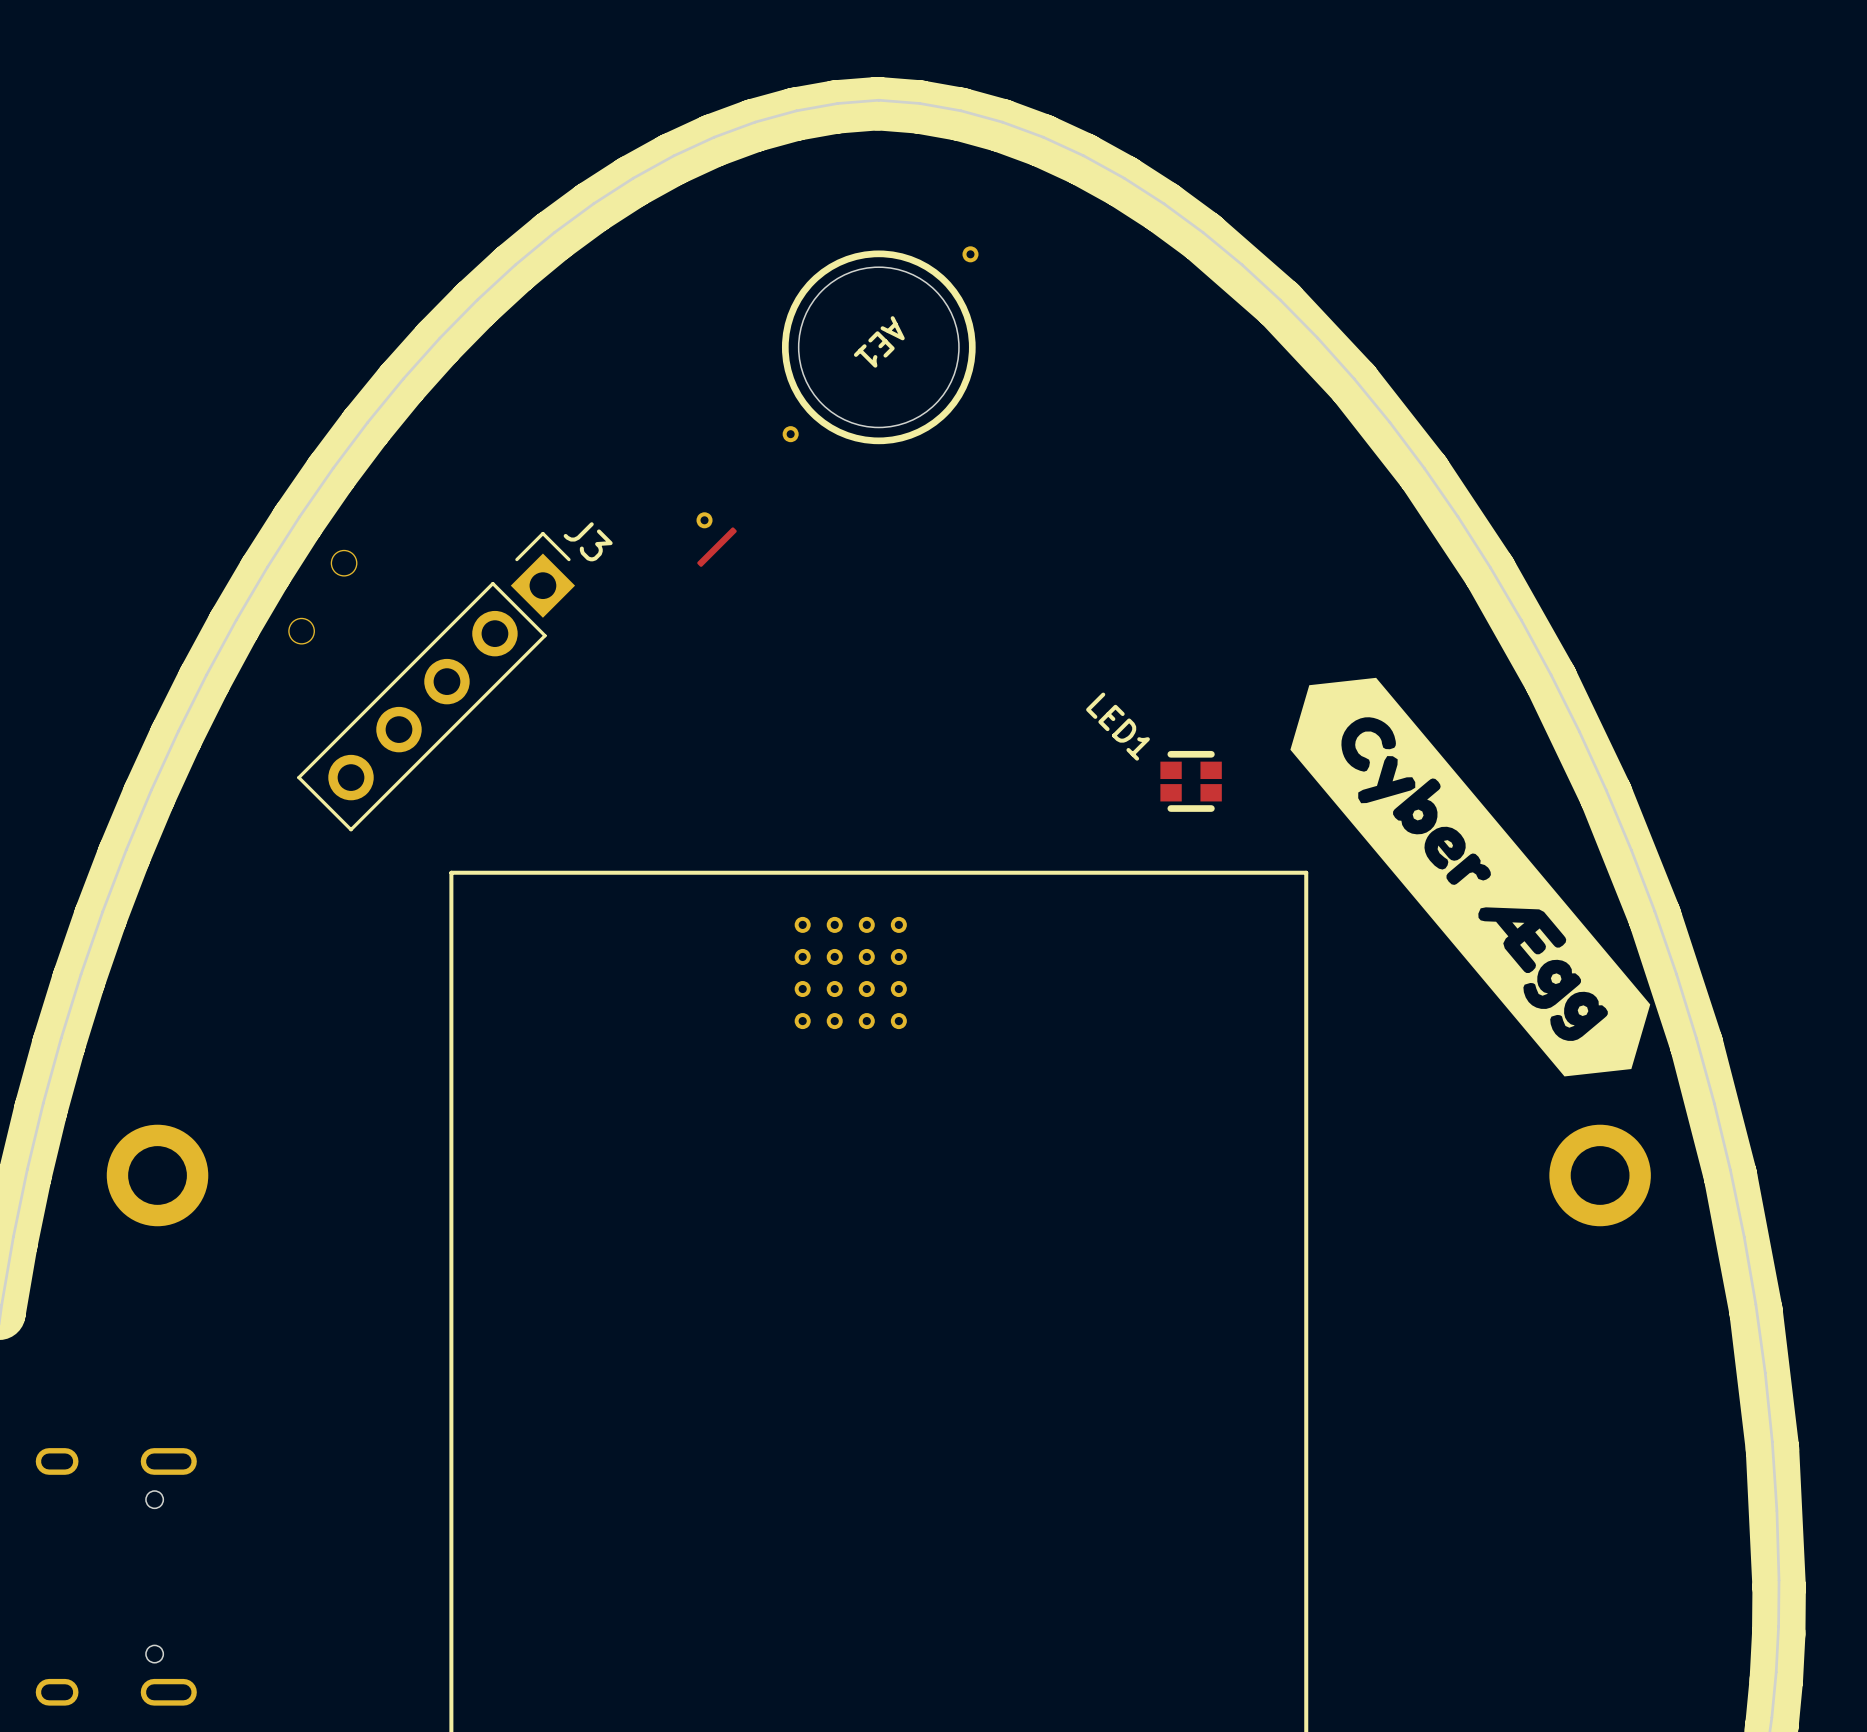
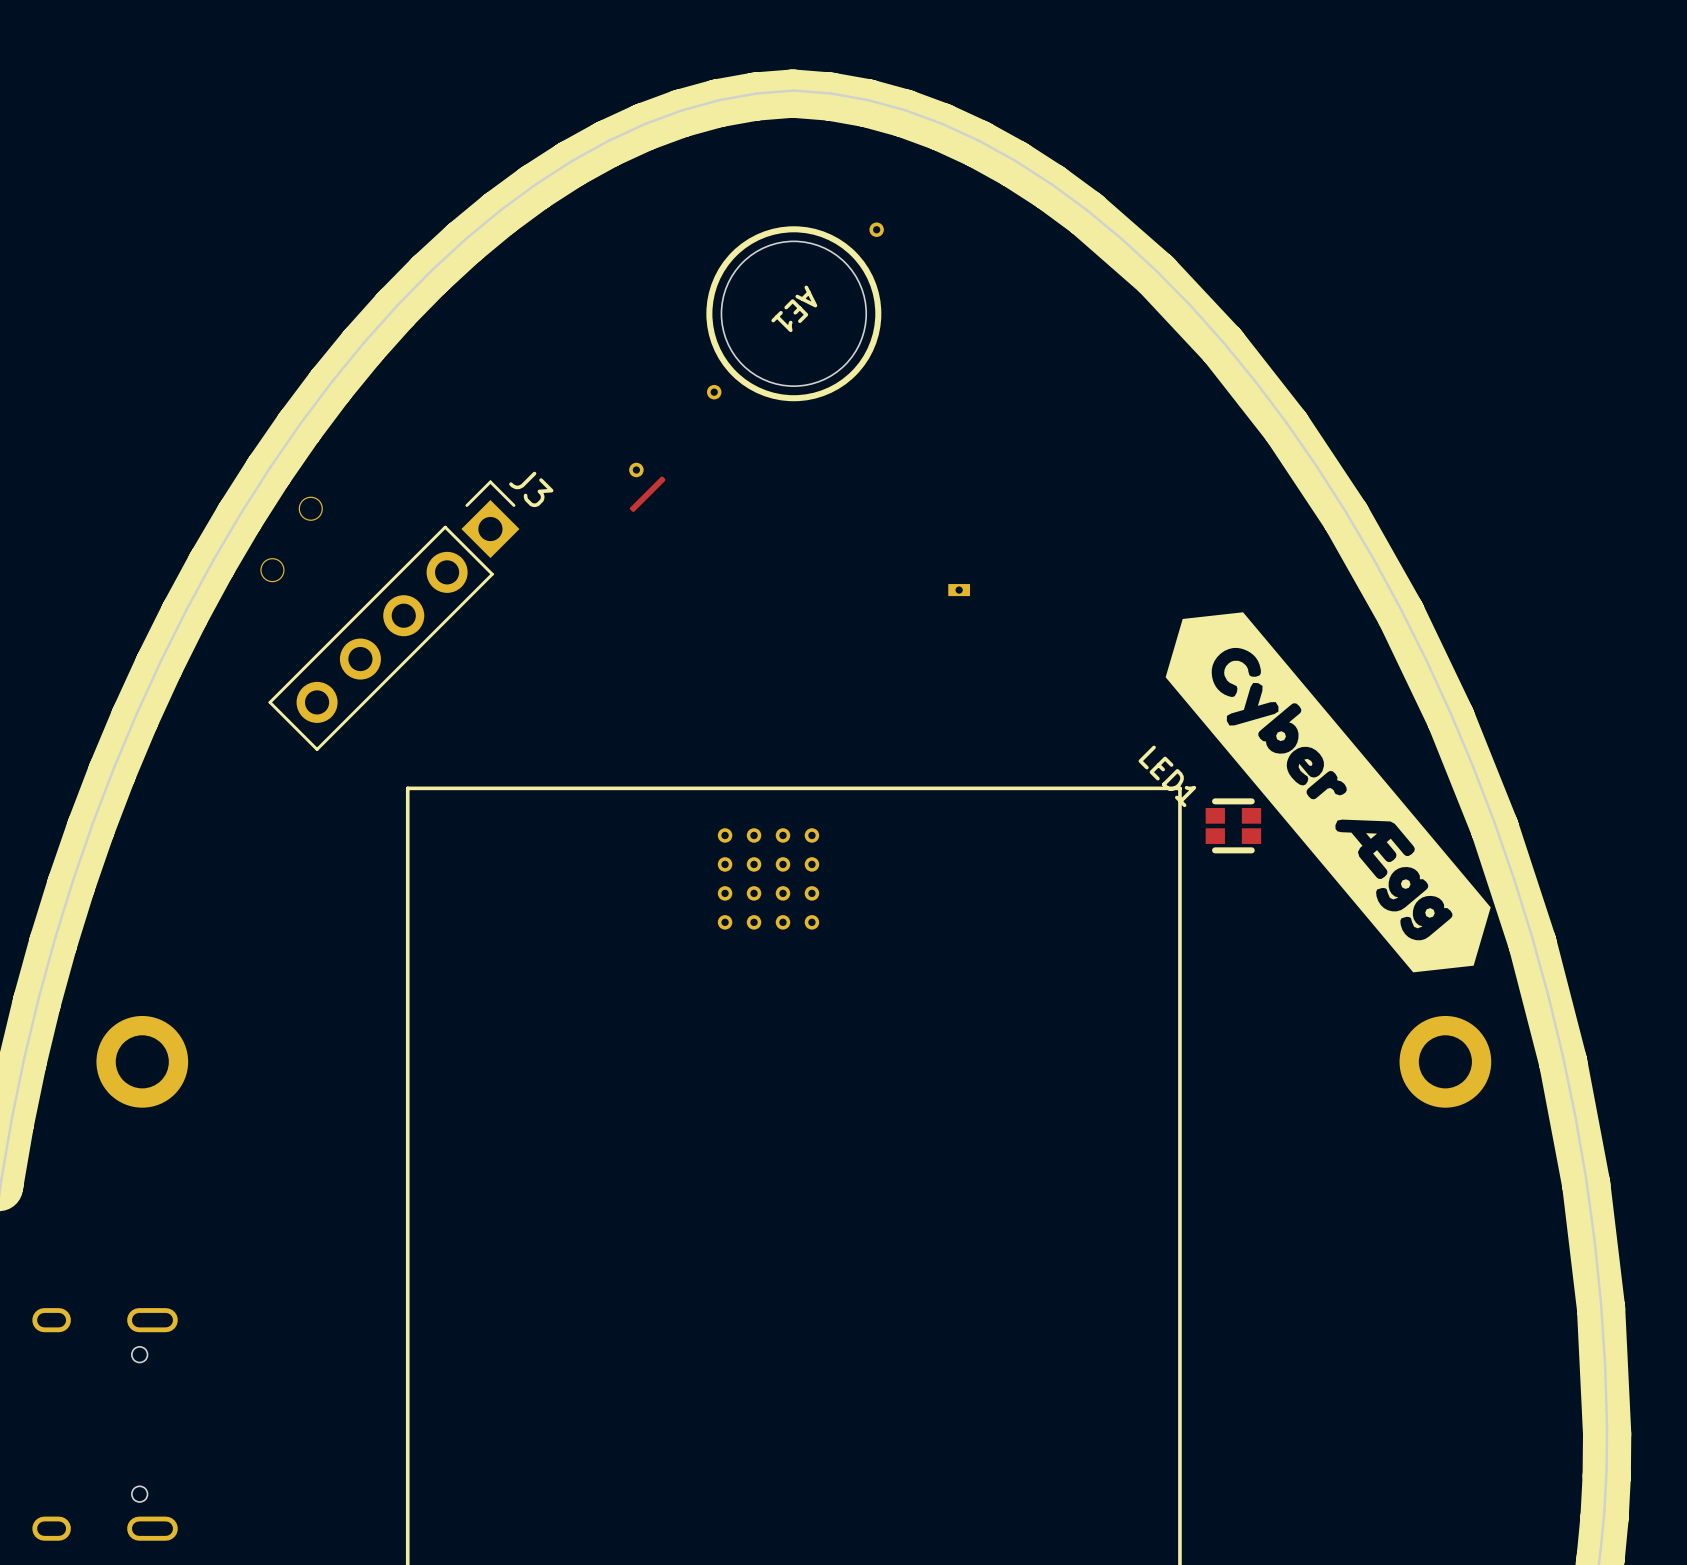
part: none -> (959, 590)
LED1 position: (1191, 781) -> (1233, 825)

